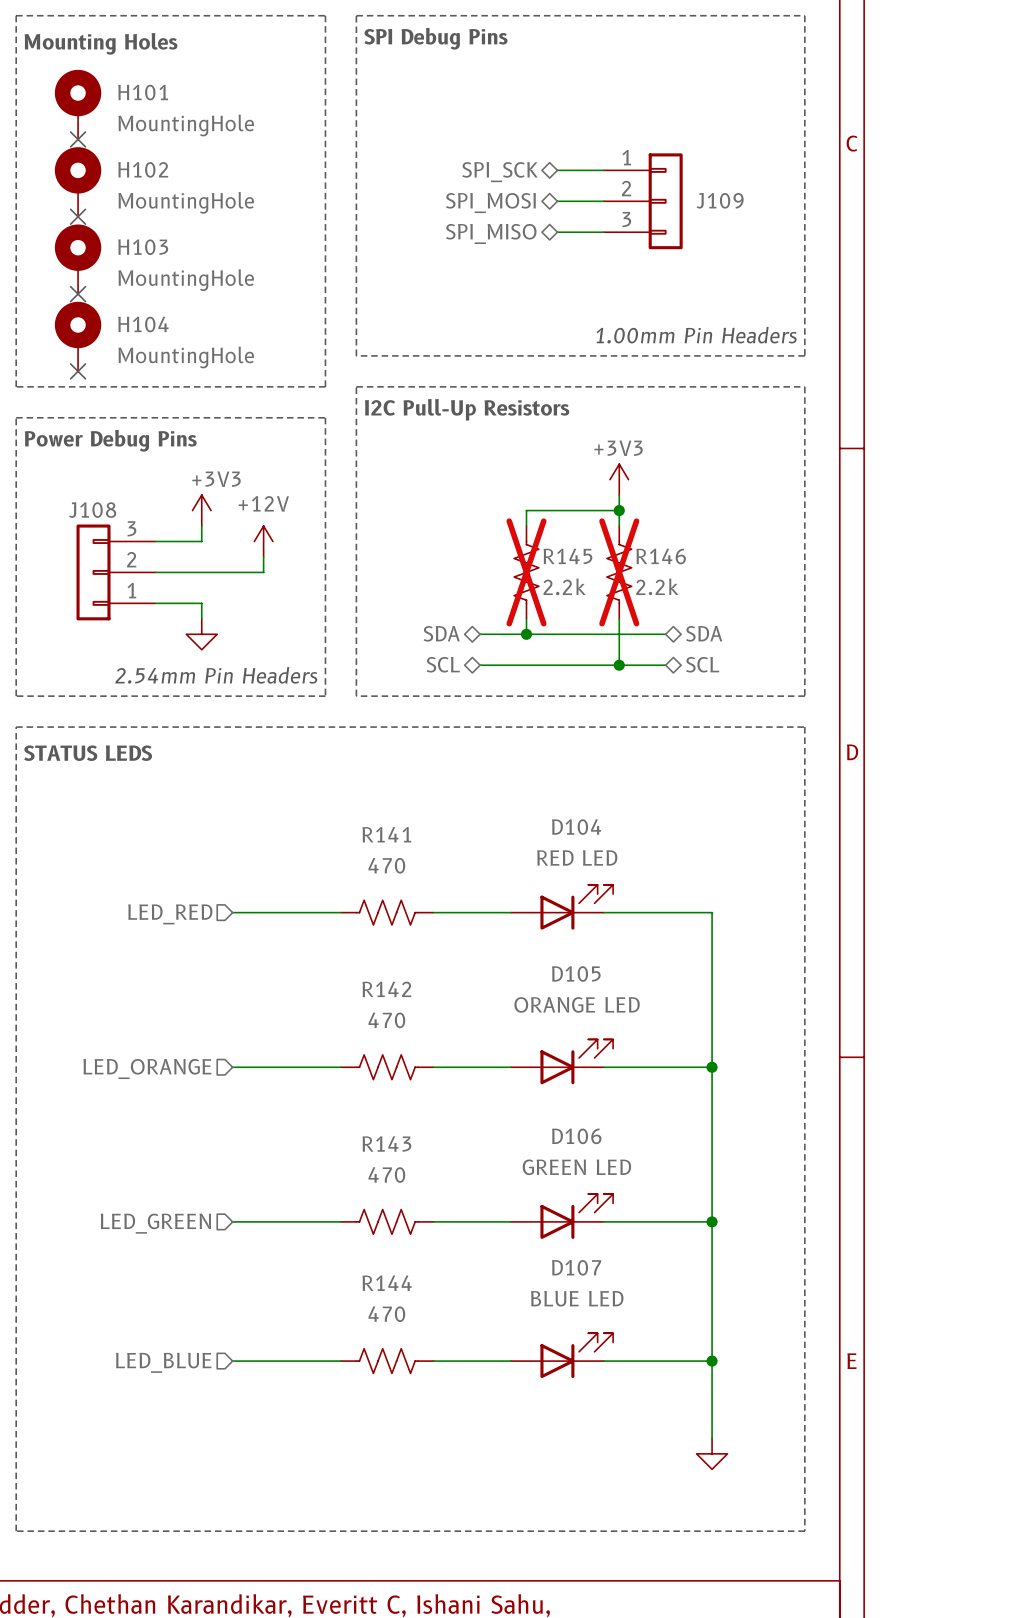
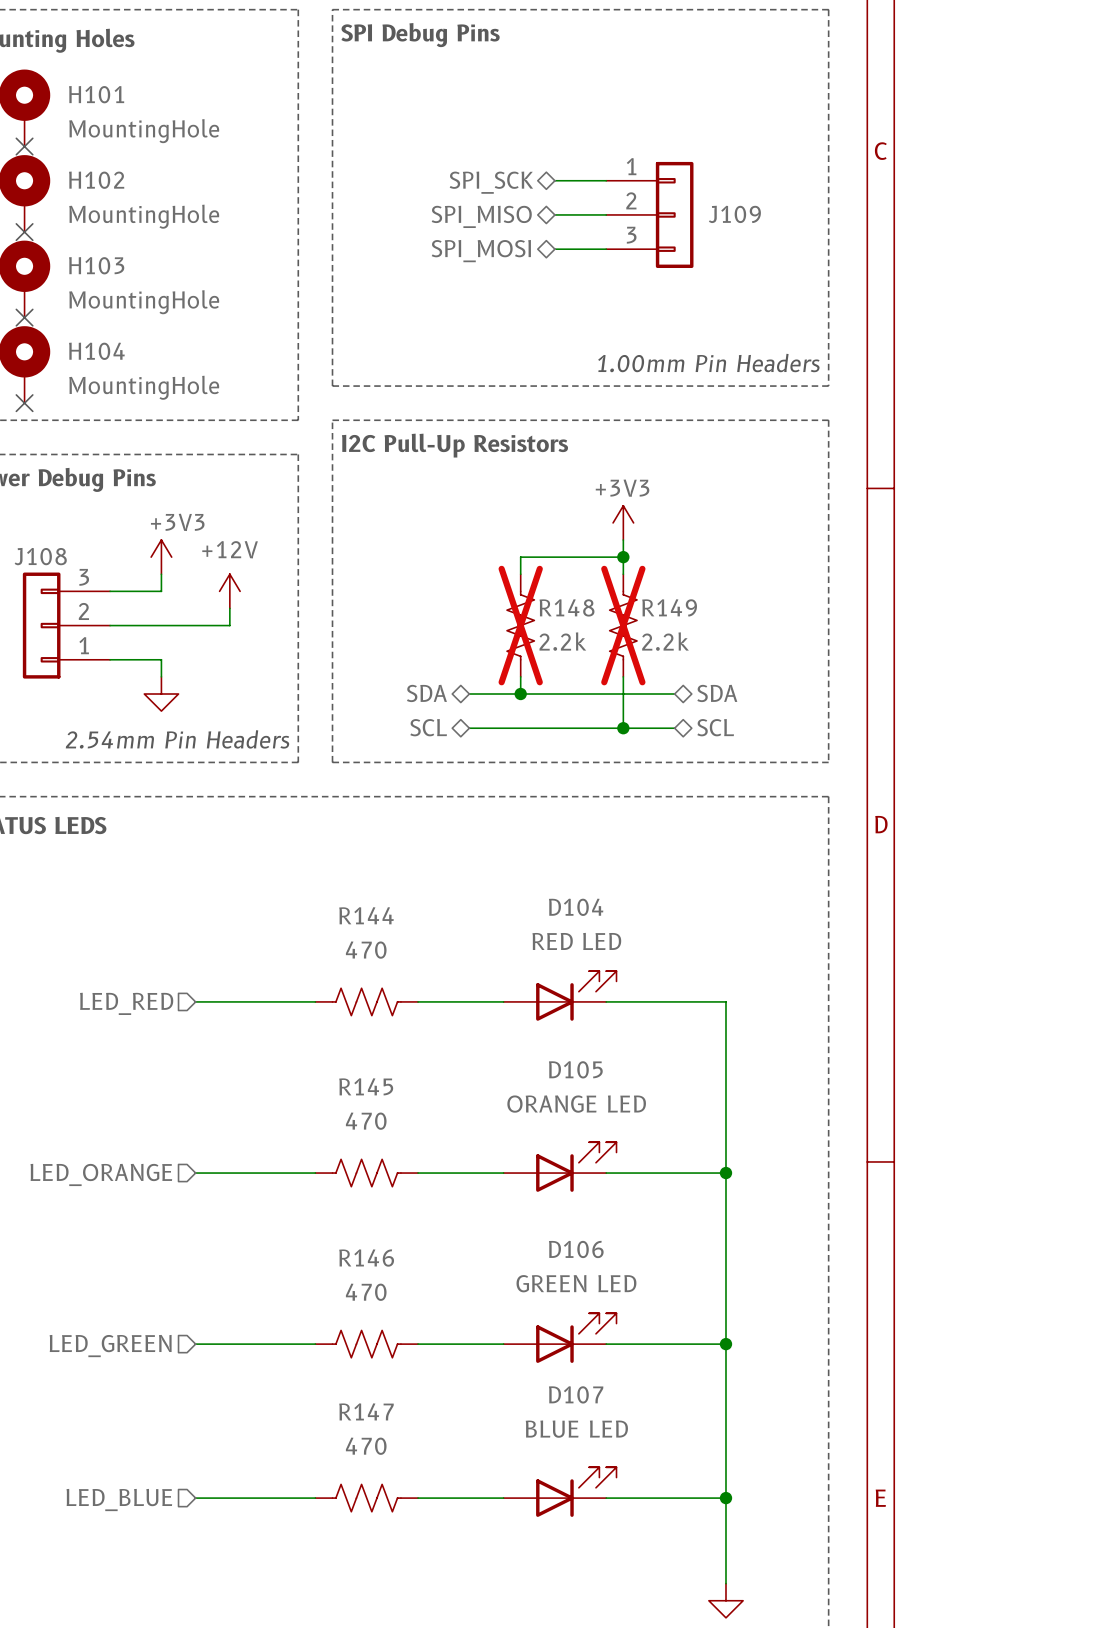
hierarchical label: SPI_MOSI (490, 203) -> SPI_MISO (481, 216)
hierarchical label: SPI_MISO (491, 233) -> SPI_MOSI (481, 251)
R145 name: R145 (567, 556) -> R148 (566, 607)
R146 name: R146 (661, 556) -> R149 (669, 607)
R141 name: R141 (386, 834) -> R144 (366, 915)
R142 name: R142 (386, 989) -> R145 (366, 1086)
R143 name: R143 (386, 1144) -> R146 (366, 1258)
R144 name: R144 (387, 1283) -> R147 (366, 1411)

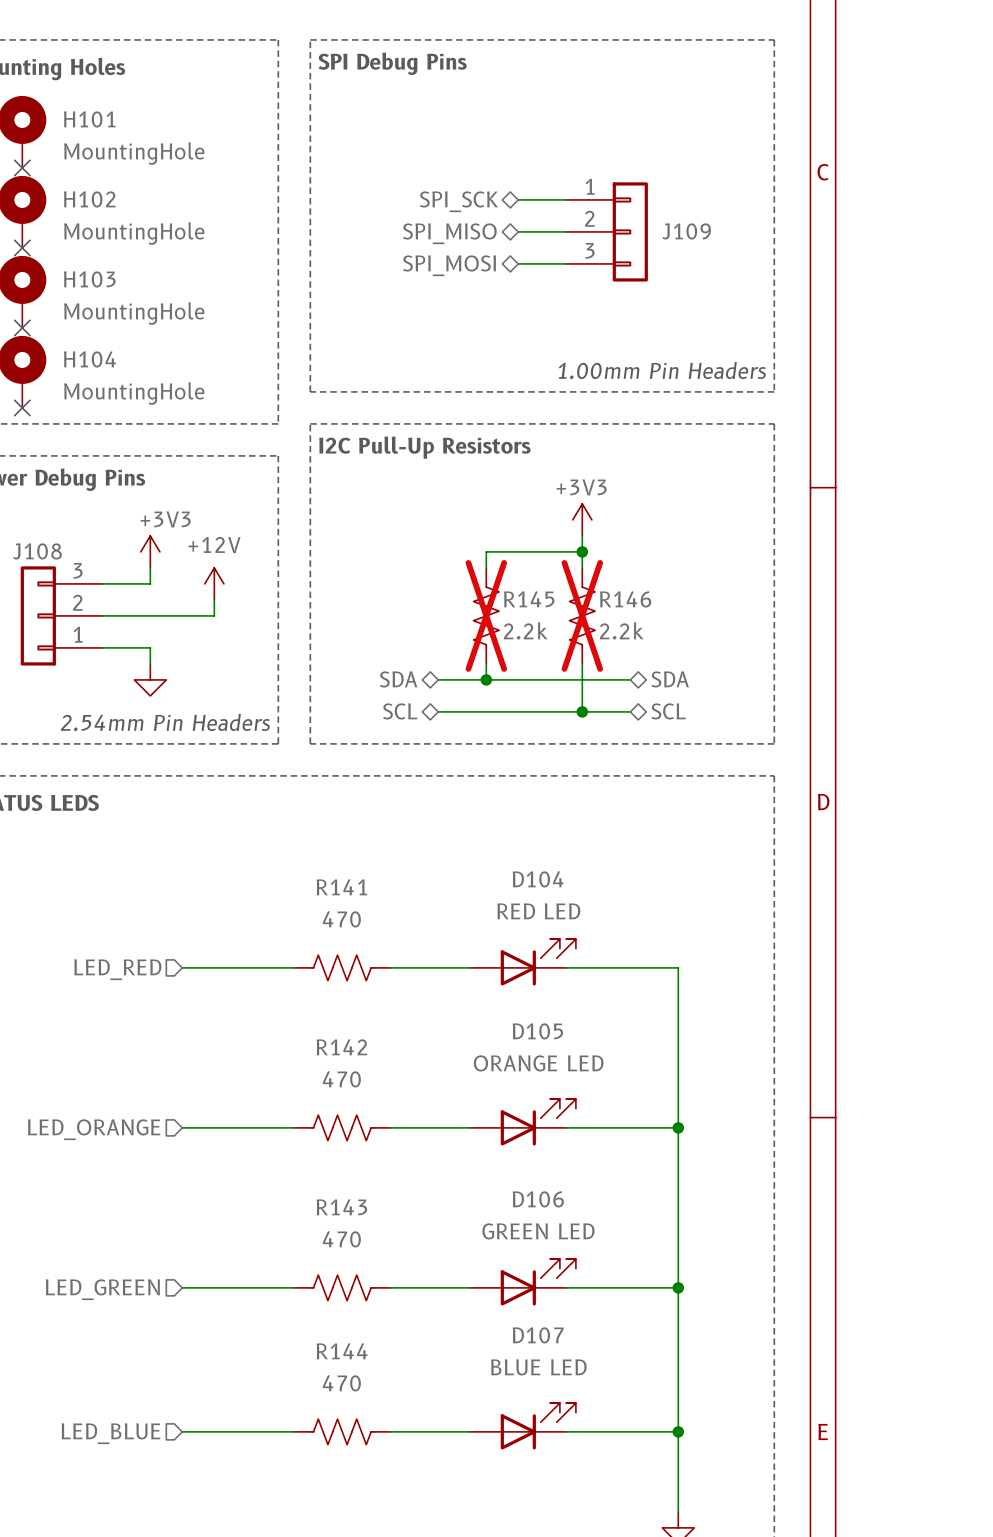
R148 name: R148 (566, 607) -> R145 (529, 599)
R149 name: R149 (669, 607) -> R146 (625, 599)
R144 name: R144 (366, 915) -> R141 (341, 887)
R145 name: R145 (366, 1086) -> R142 (341, 1047)
R146 name: R146 (366, 1258) -> R143 (341, 1207)
R147 name: R147 (366, 1411) -> R144 (342, 1351)

